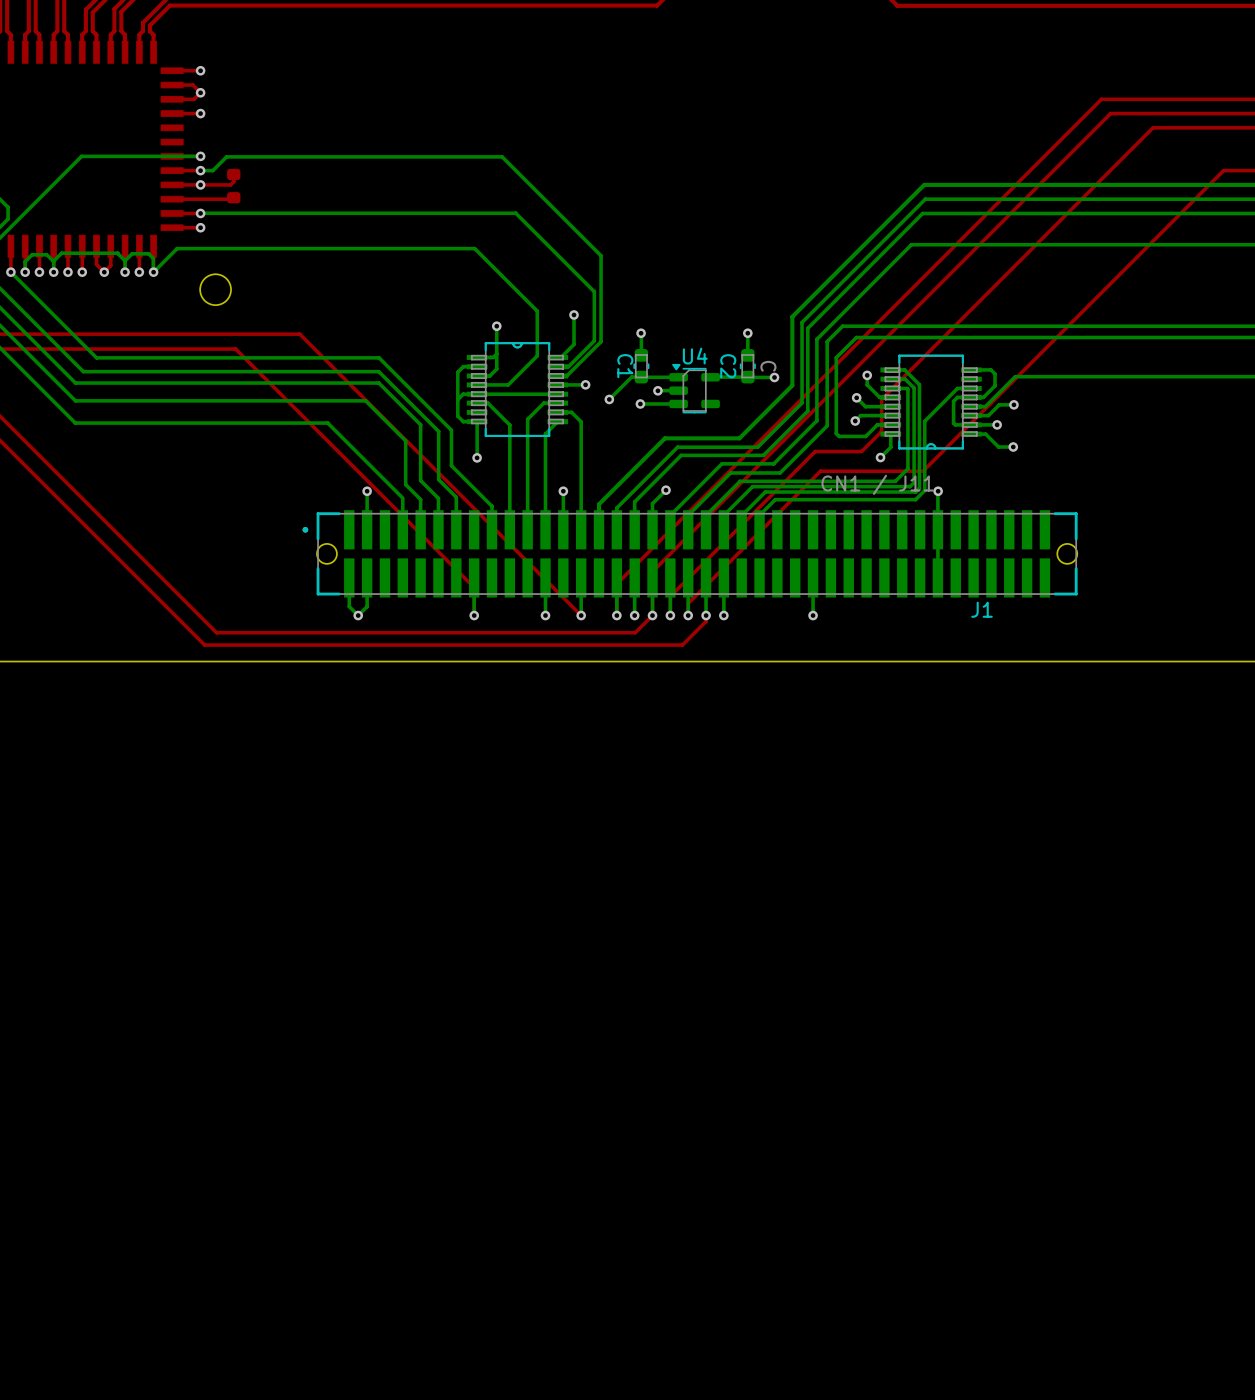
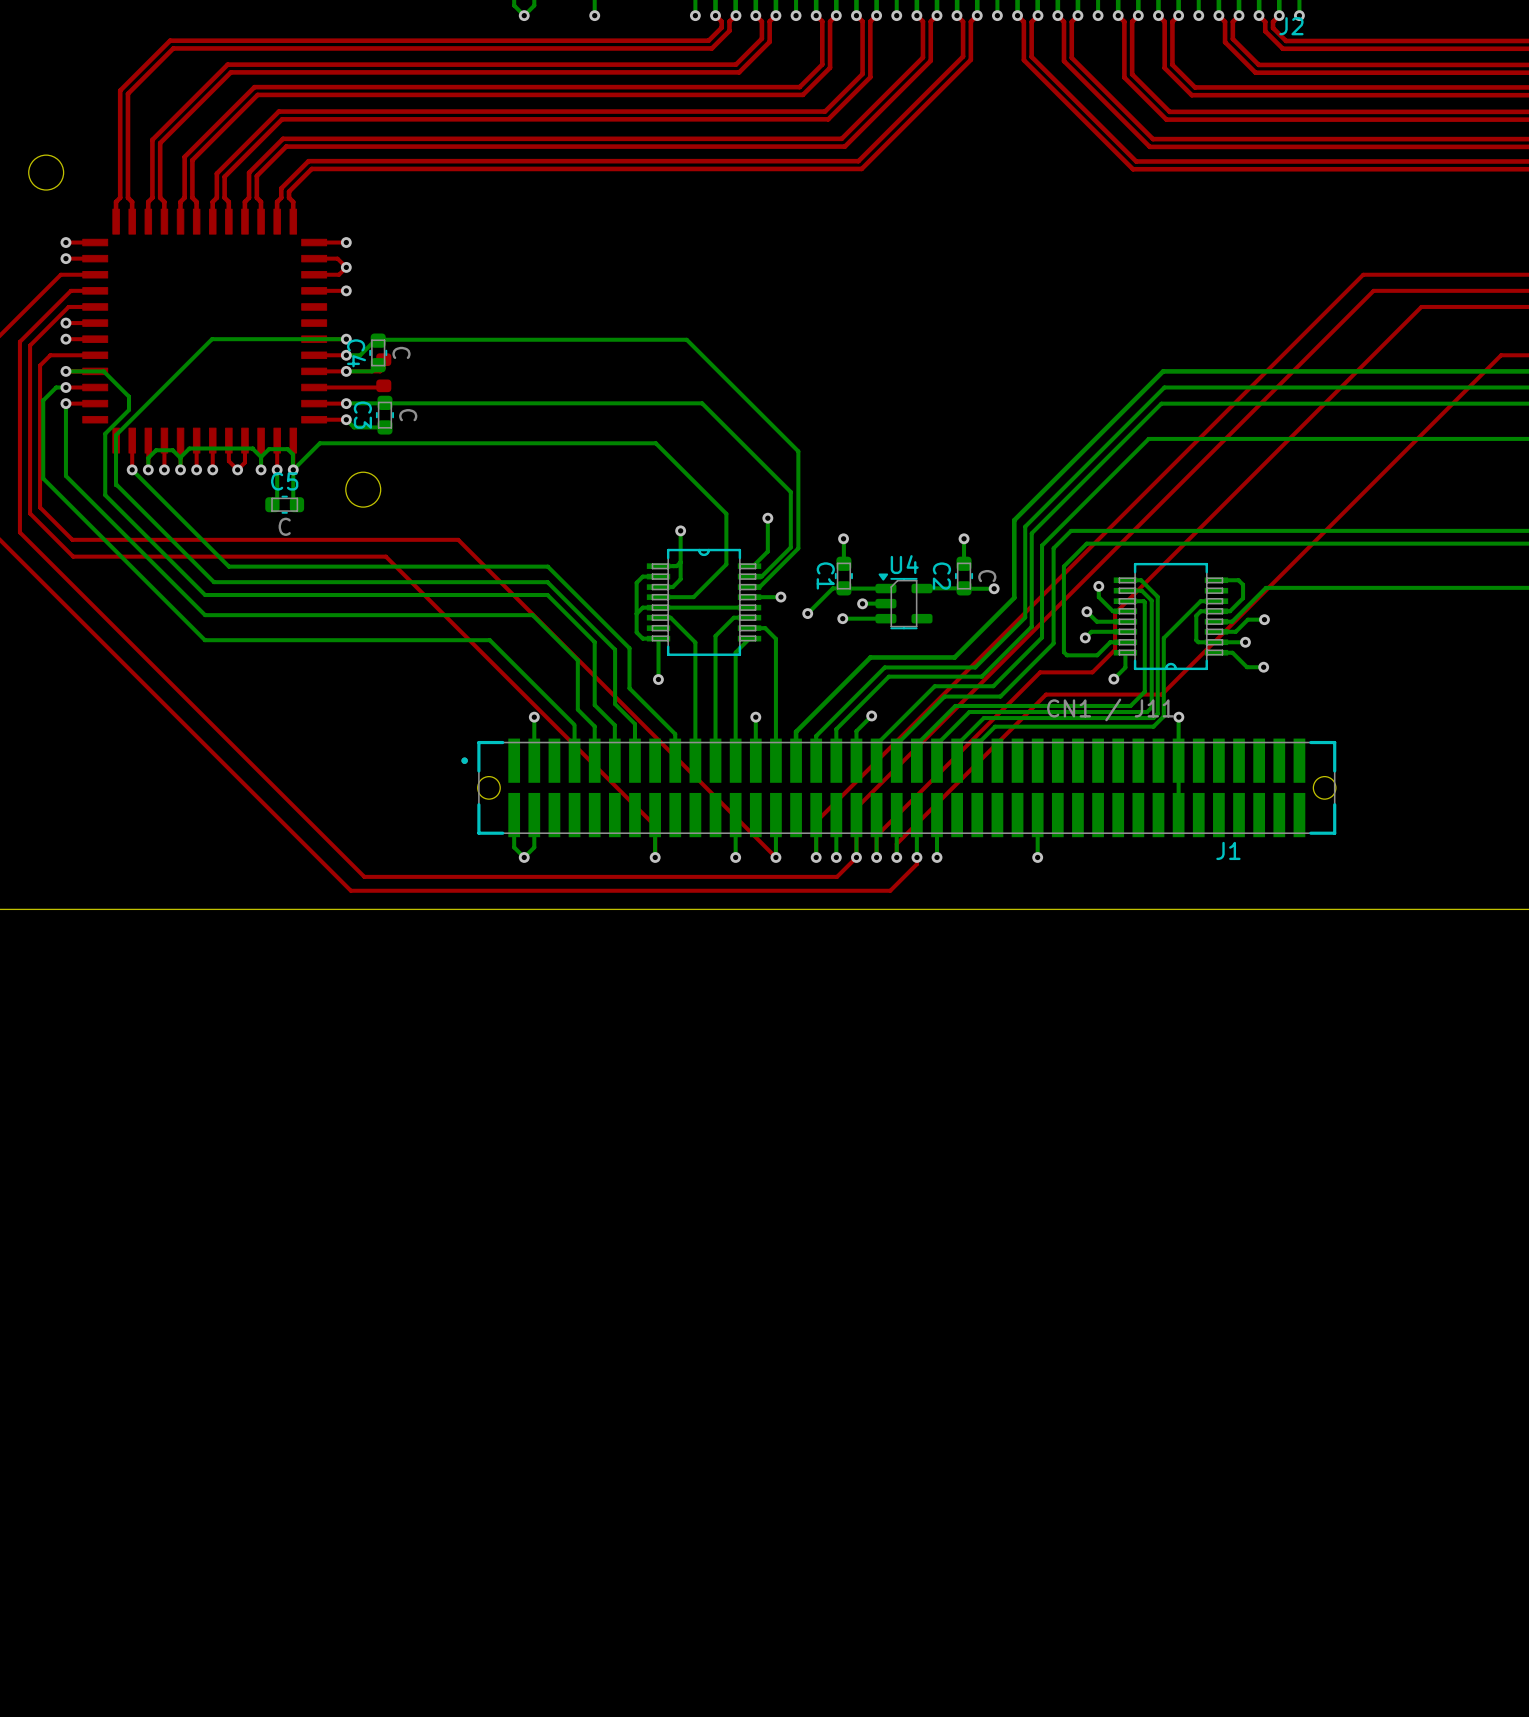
C4: none -> C (378, 352)
bottom track: none -> (378, 365) (372, 371) (346, 371)
C3: none -> C (384, 415)
bottom track: none -> (346, 419) (354, 427) (384, 427)
bottom track: none -> (277, 469) (277, 499) (272, 504)
bottom track: none -> (293, 469) (293, 501) (296, 504)
C5: none -> C (284, 504)

